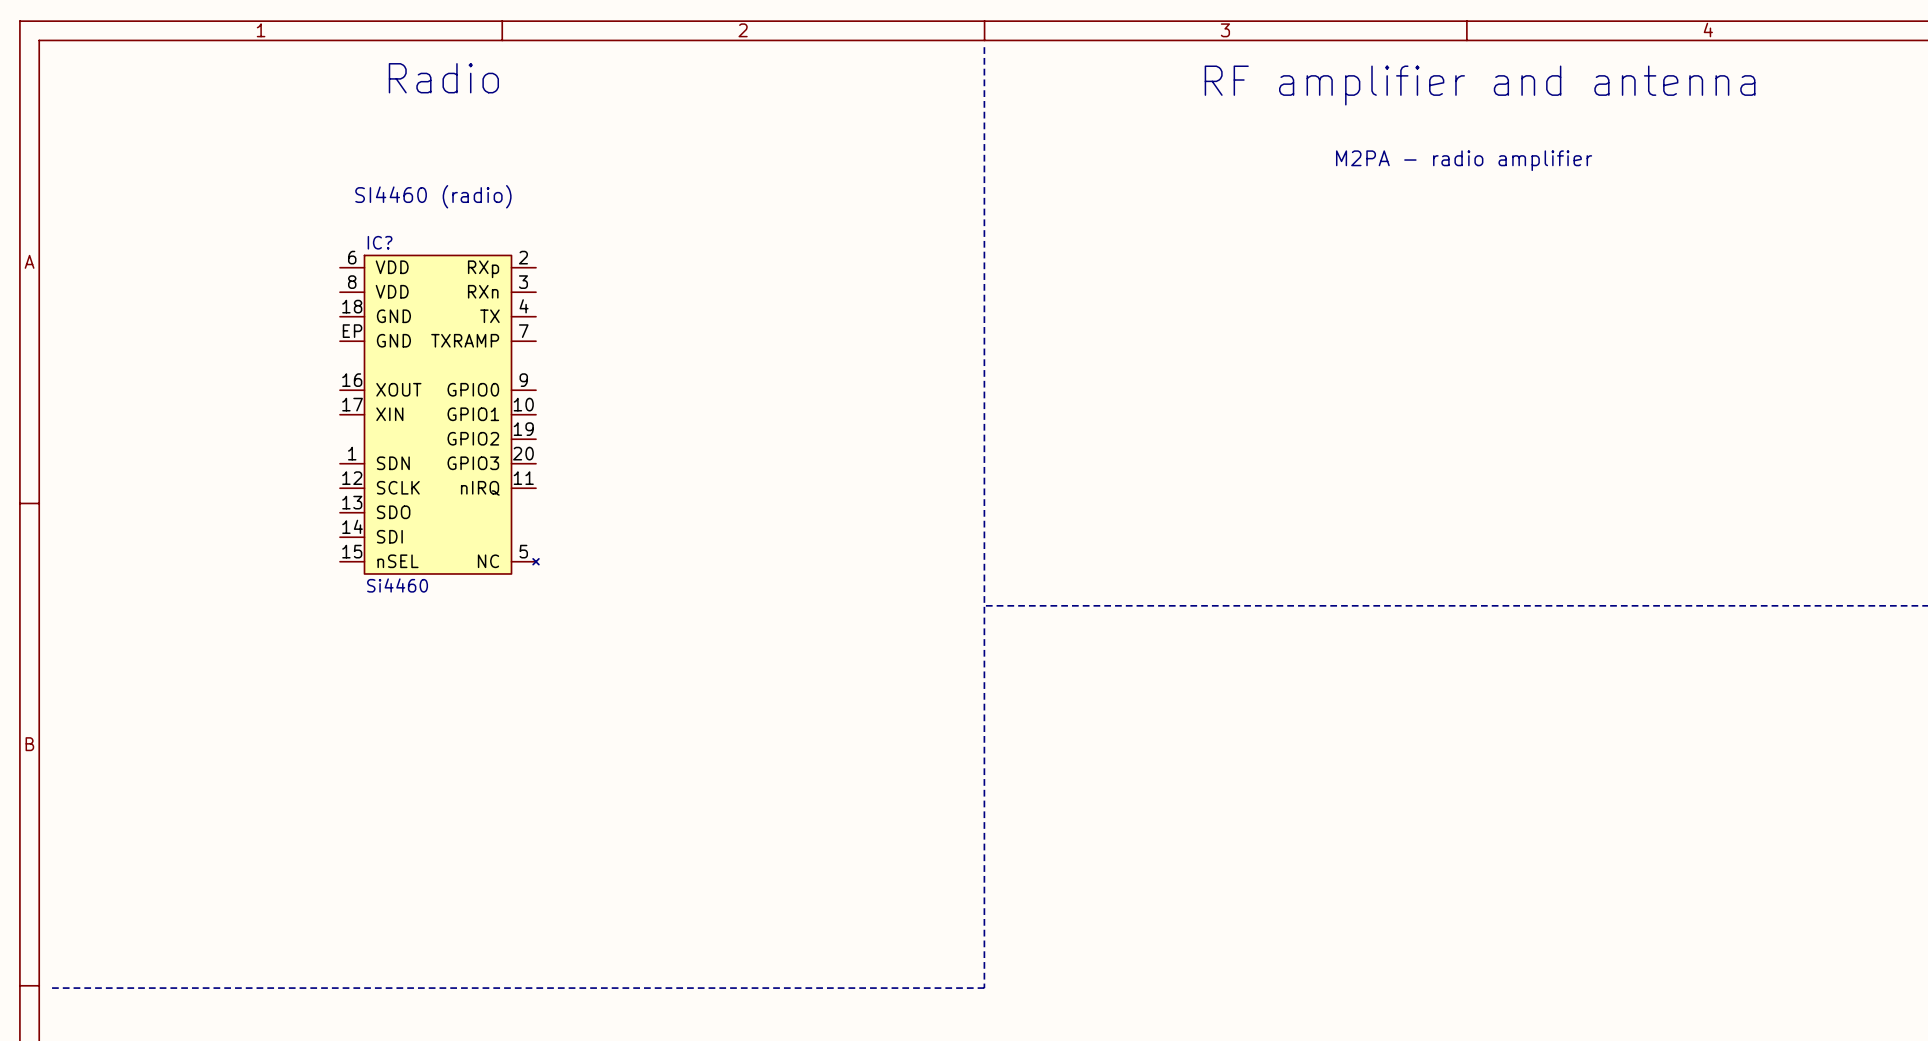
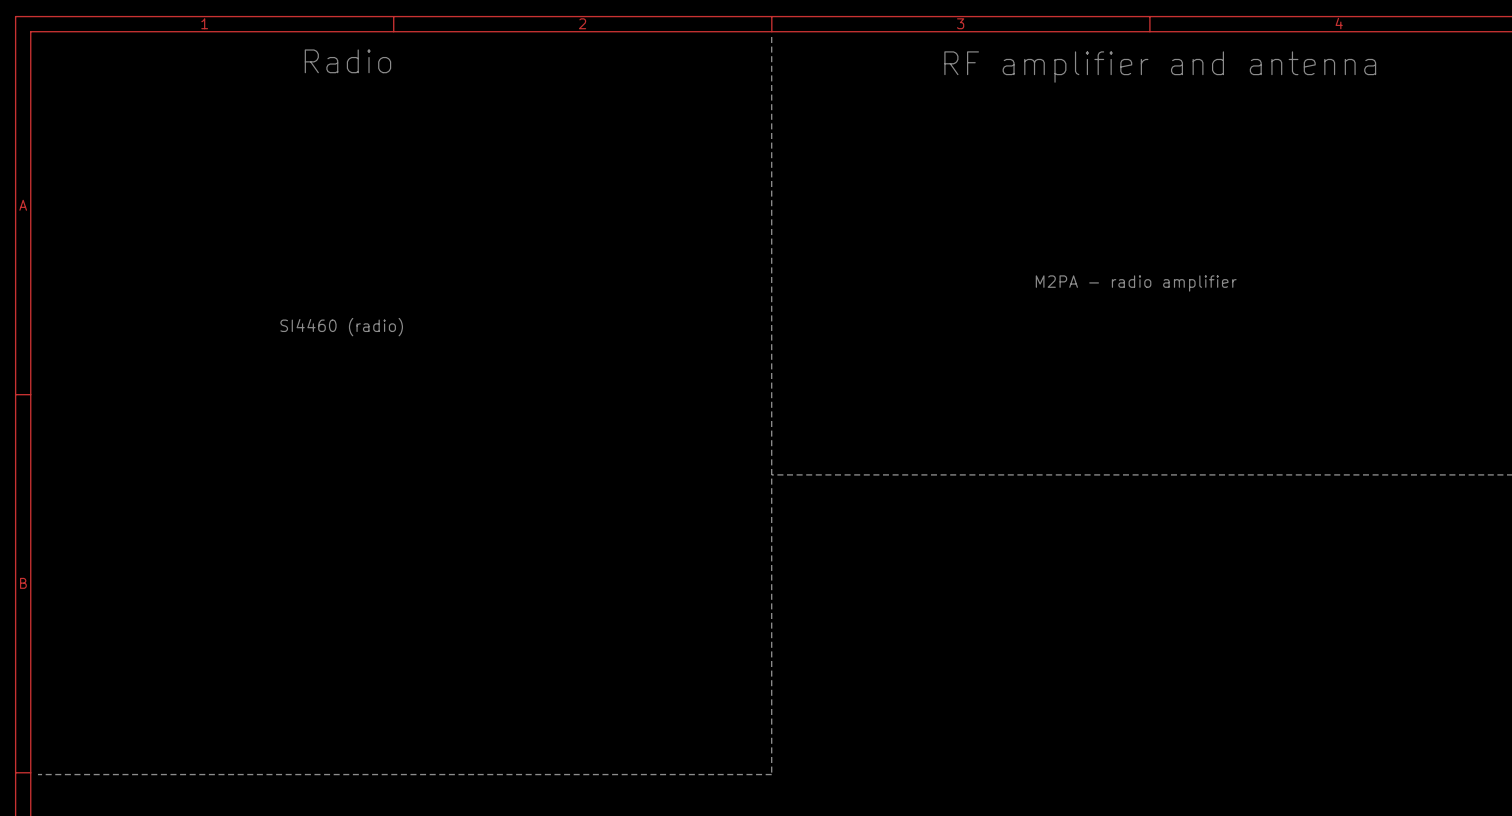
text position: M2PA - radio amplifier (1464, 160) -> M2PA - radio amplifier (1136, 283)
text position: SI4460 (radio) (433, 196) -> SI4460 (radio) (341, 327)
IC?: Si4460 (439, 414) -> none

